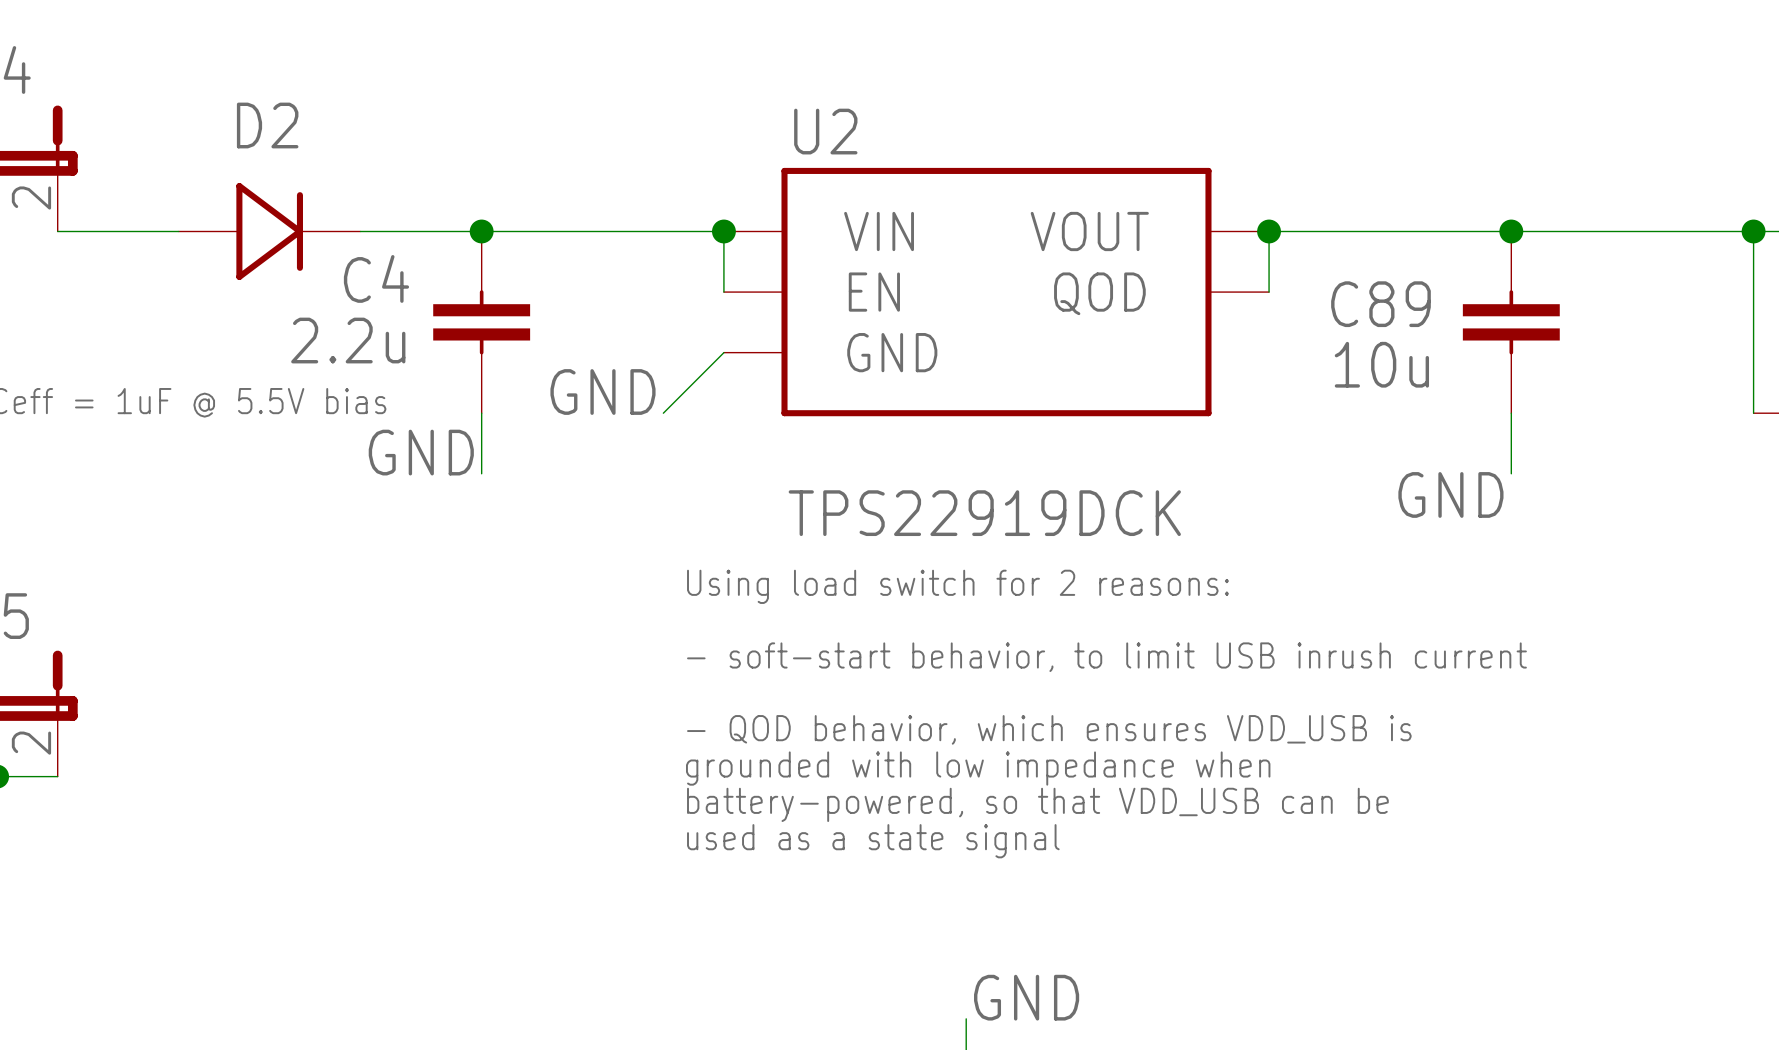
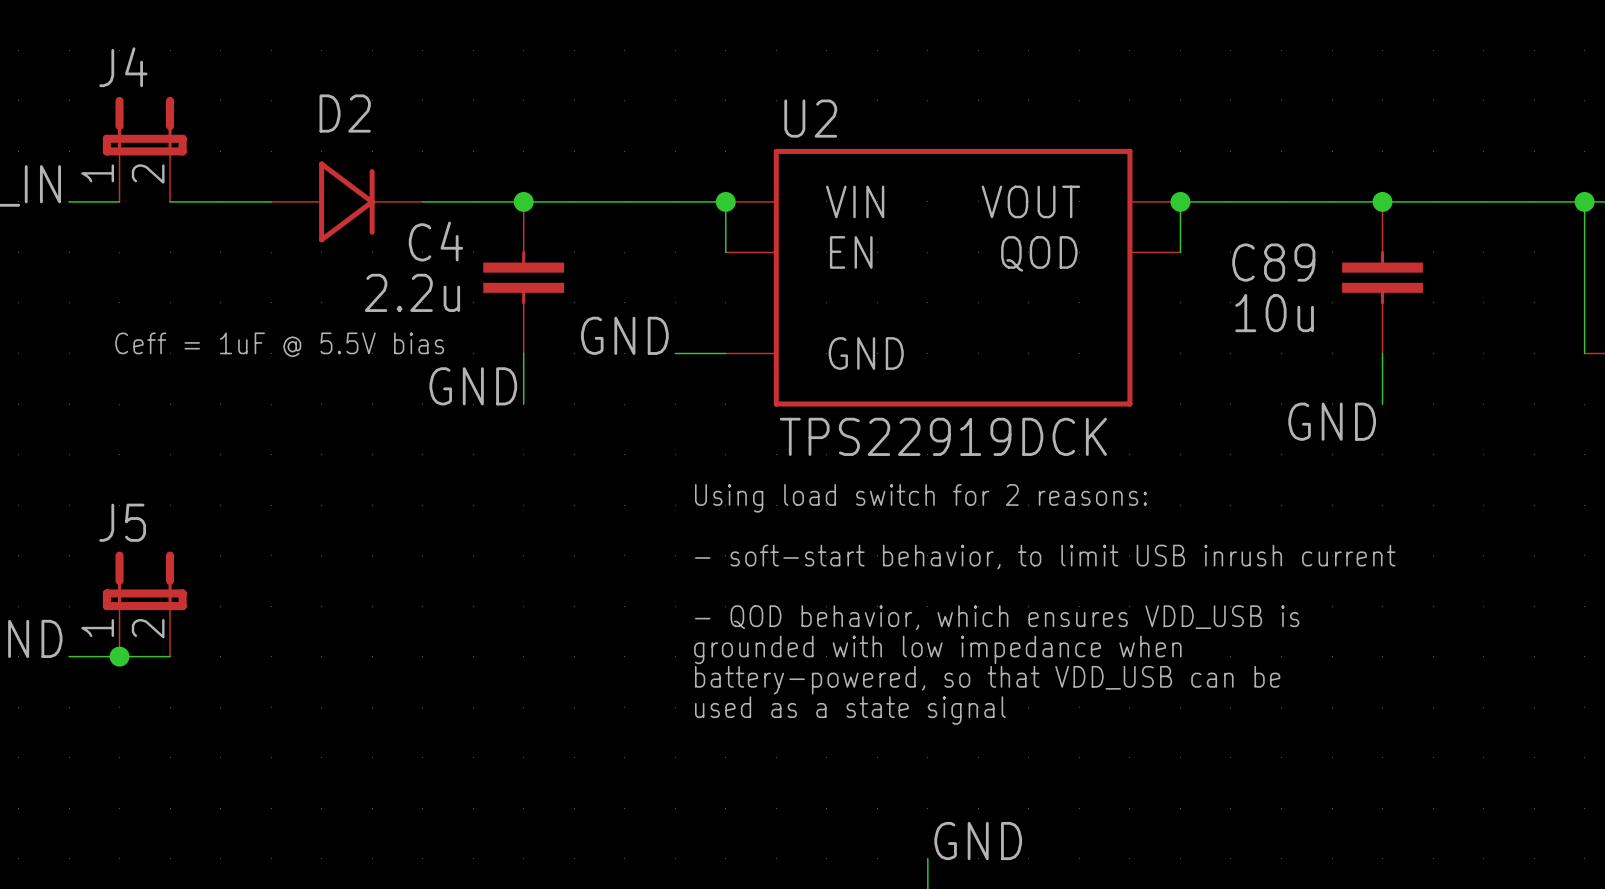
U2 symbol: [723, 167, 1270, 417] -> [725, 148, 1181, 407]
wire: (723, 352) (663, 413) -> (725, 353) (675, 353)

